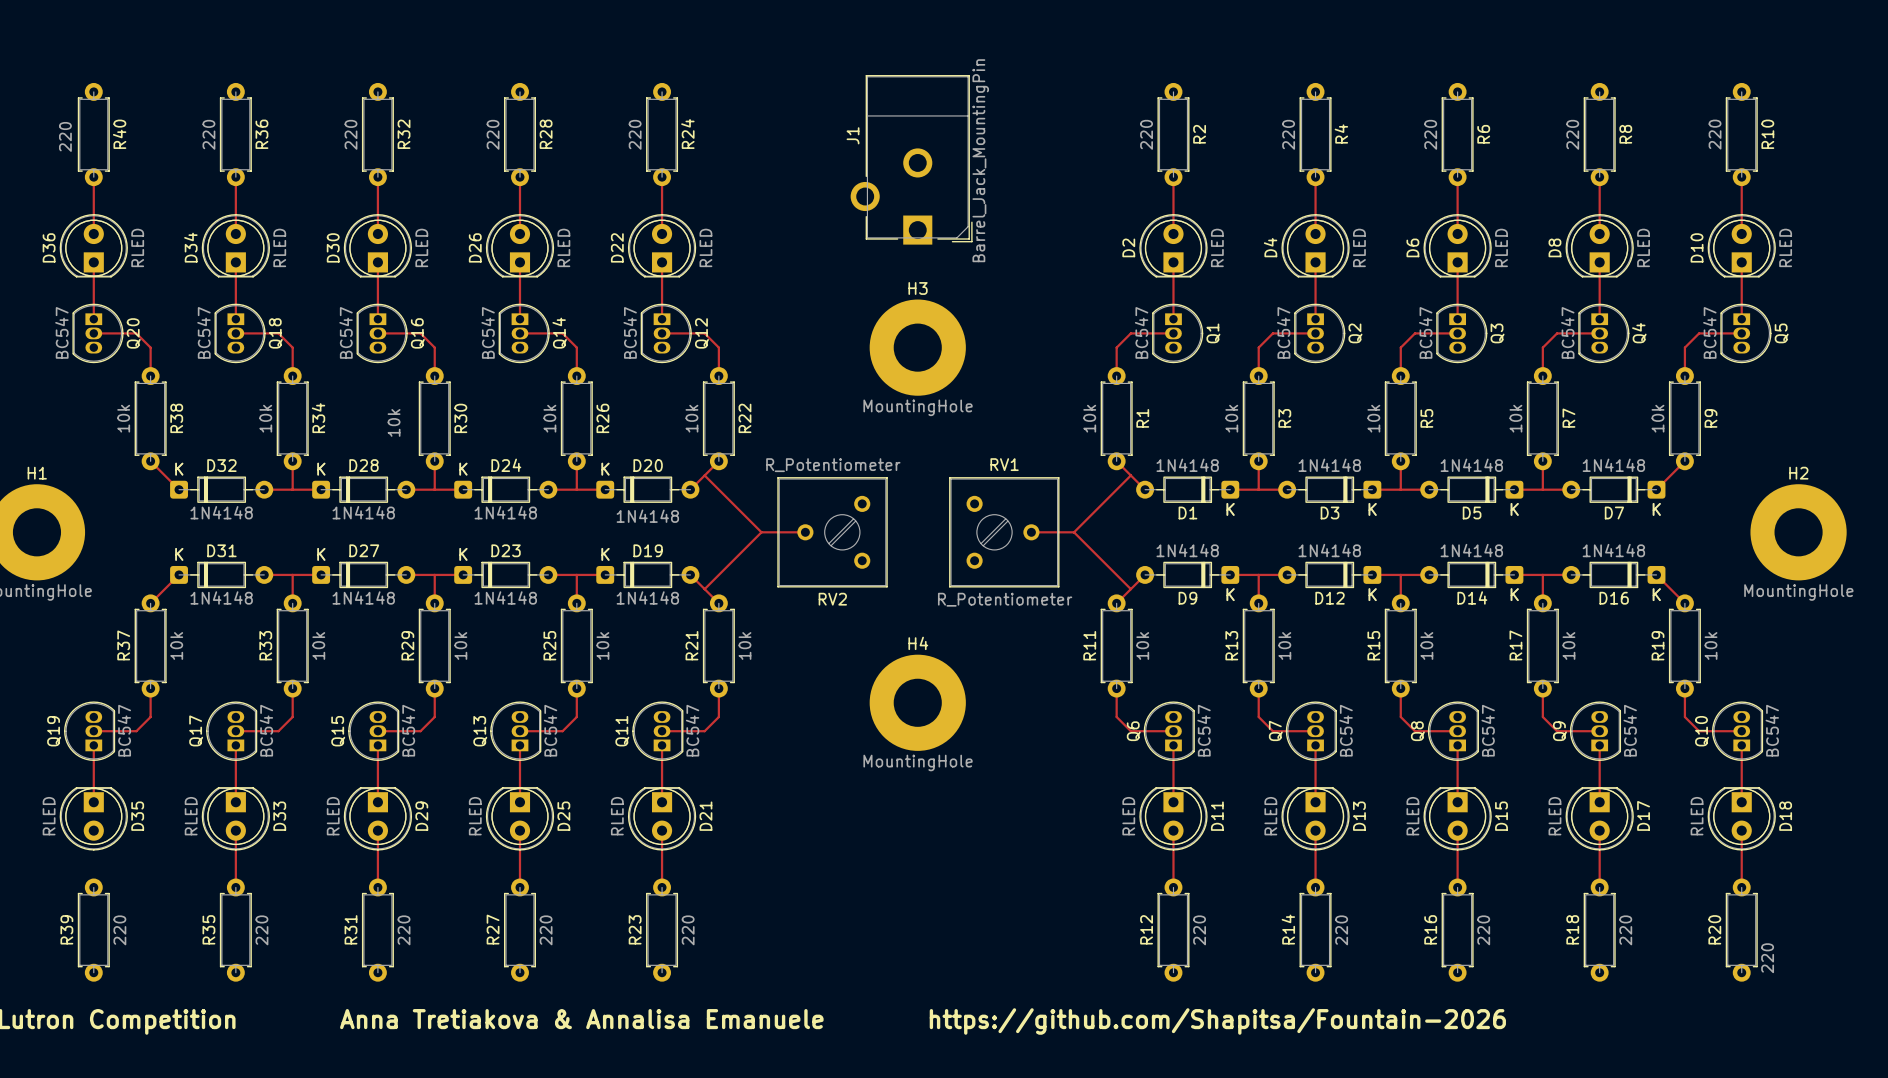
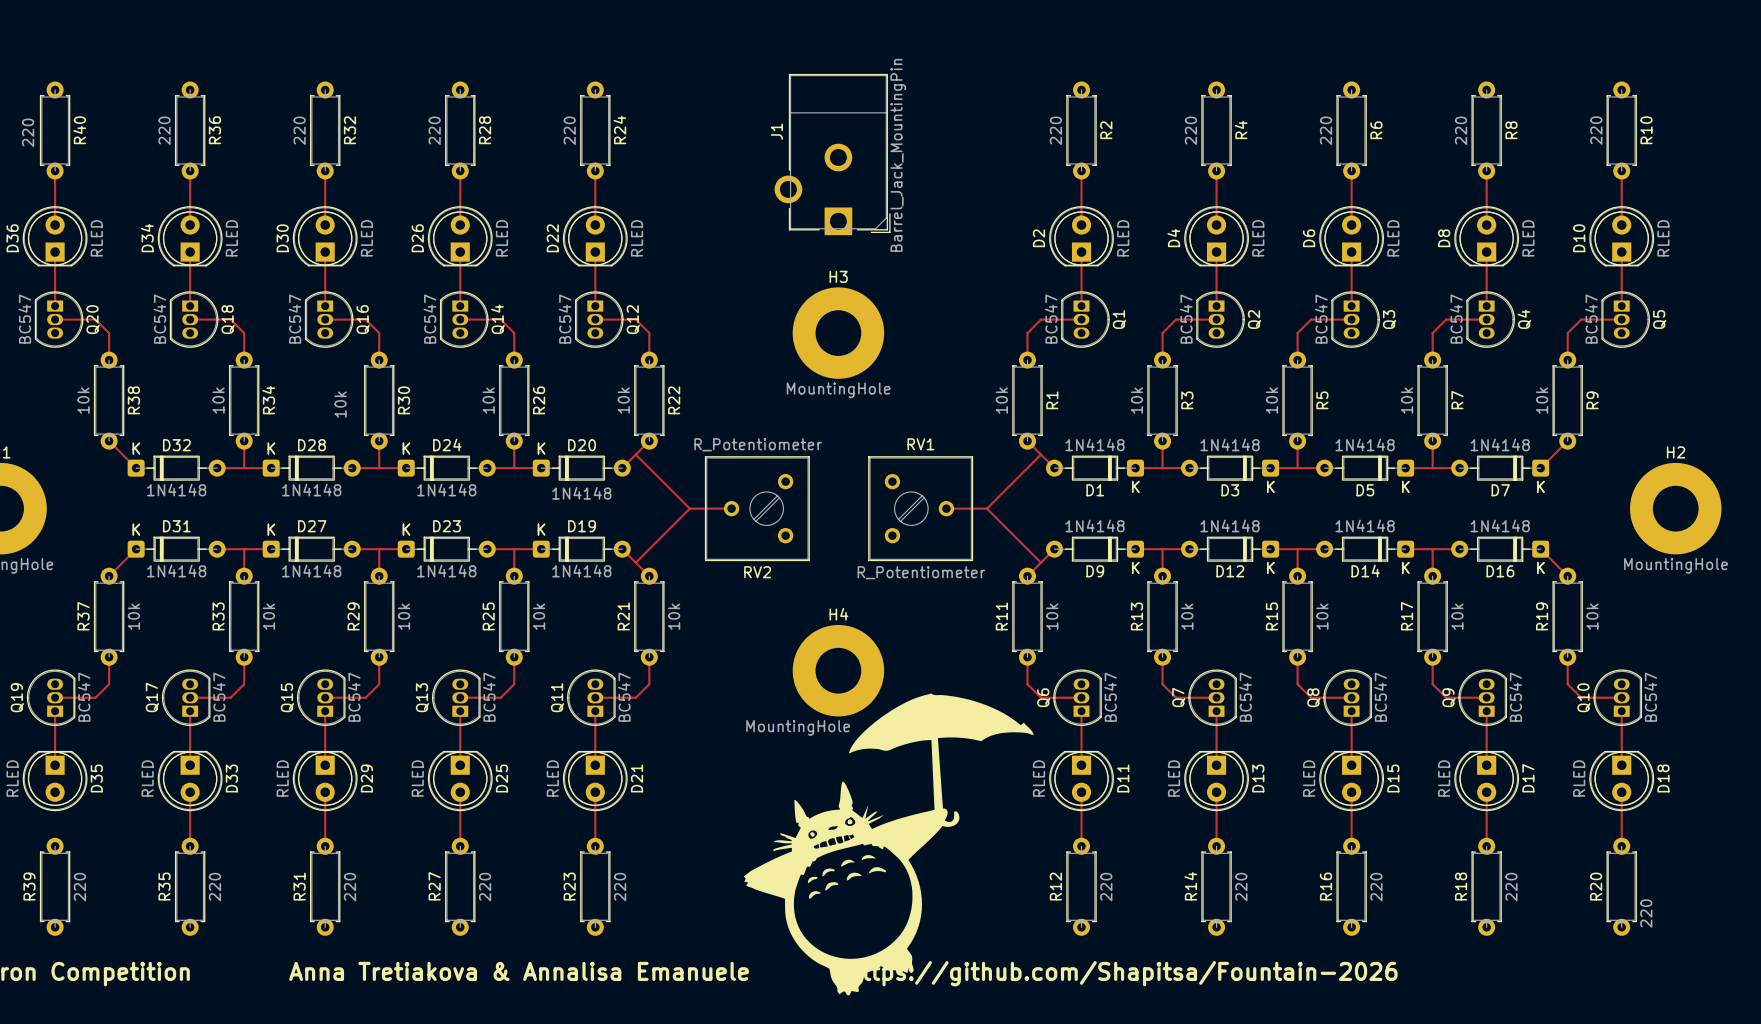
drawing: none -> [743, 693, 1035, 996]
H4 value position: MountingHole (918, 762) -> MountingHole (798, 727)

